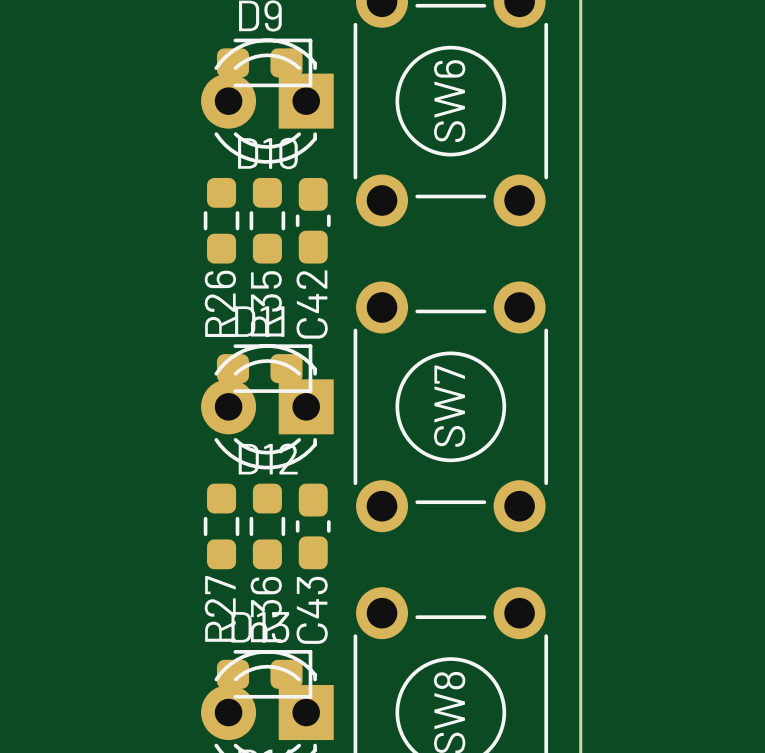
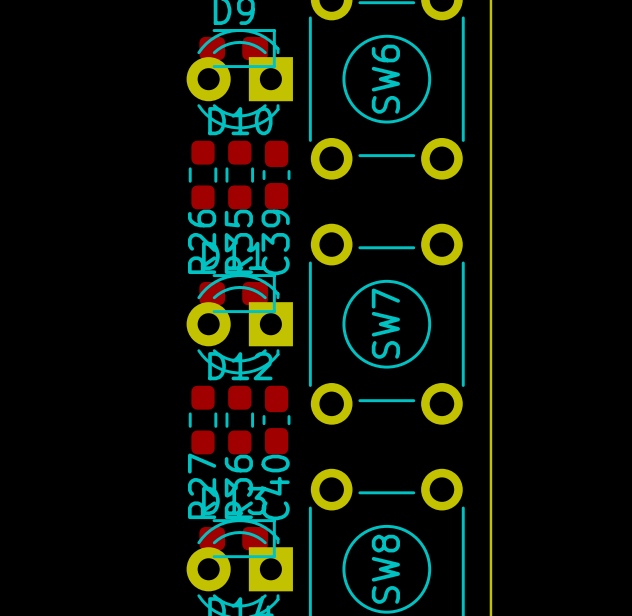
C42 name: C42 (312, 304) -> C39 (275, 242)
C43 name: C43 (312, 610) -> C40 (275, 487)

